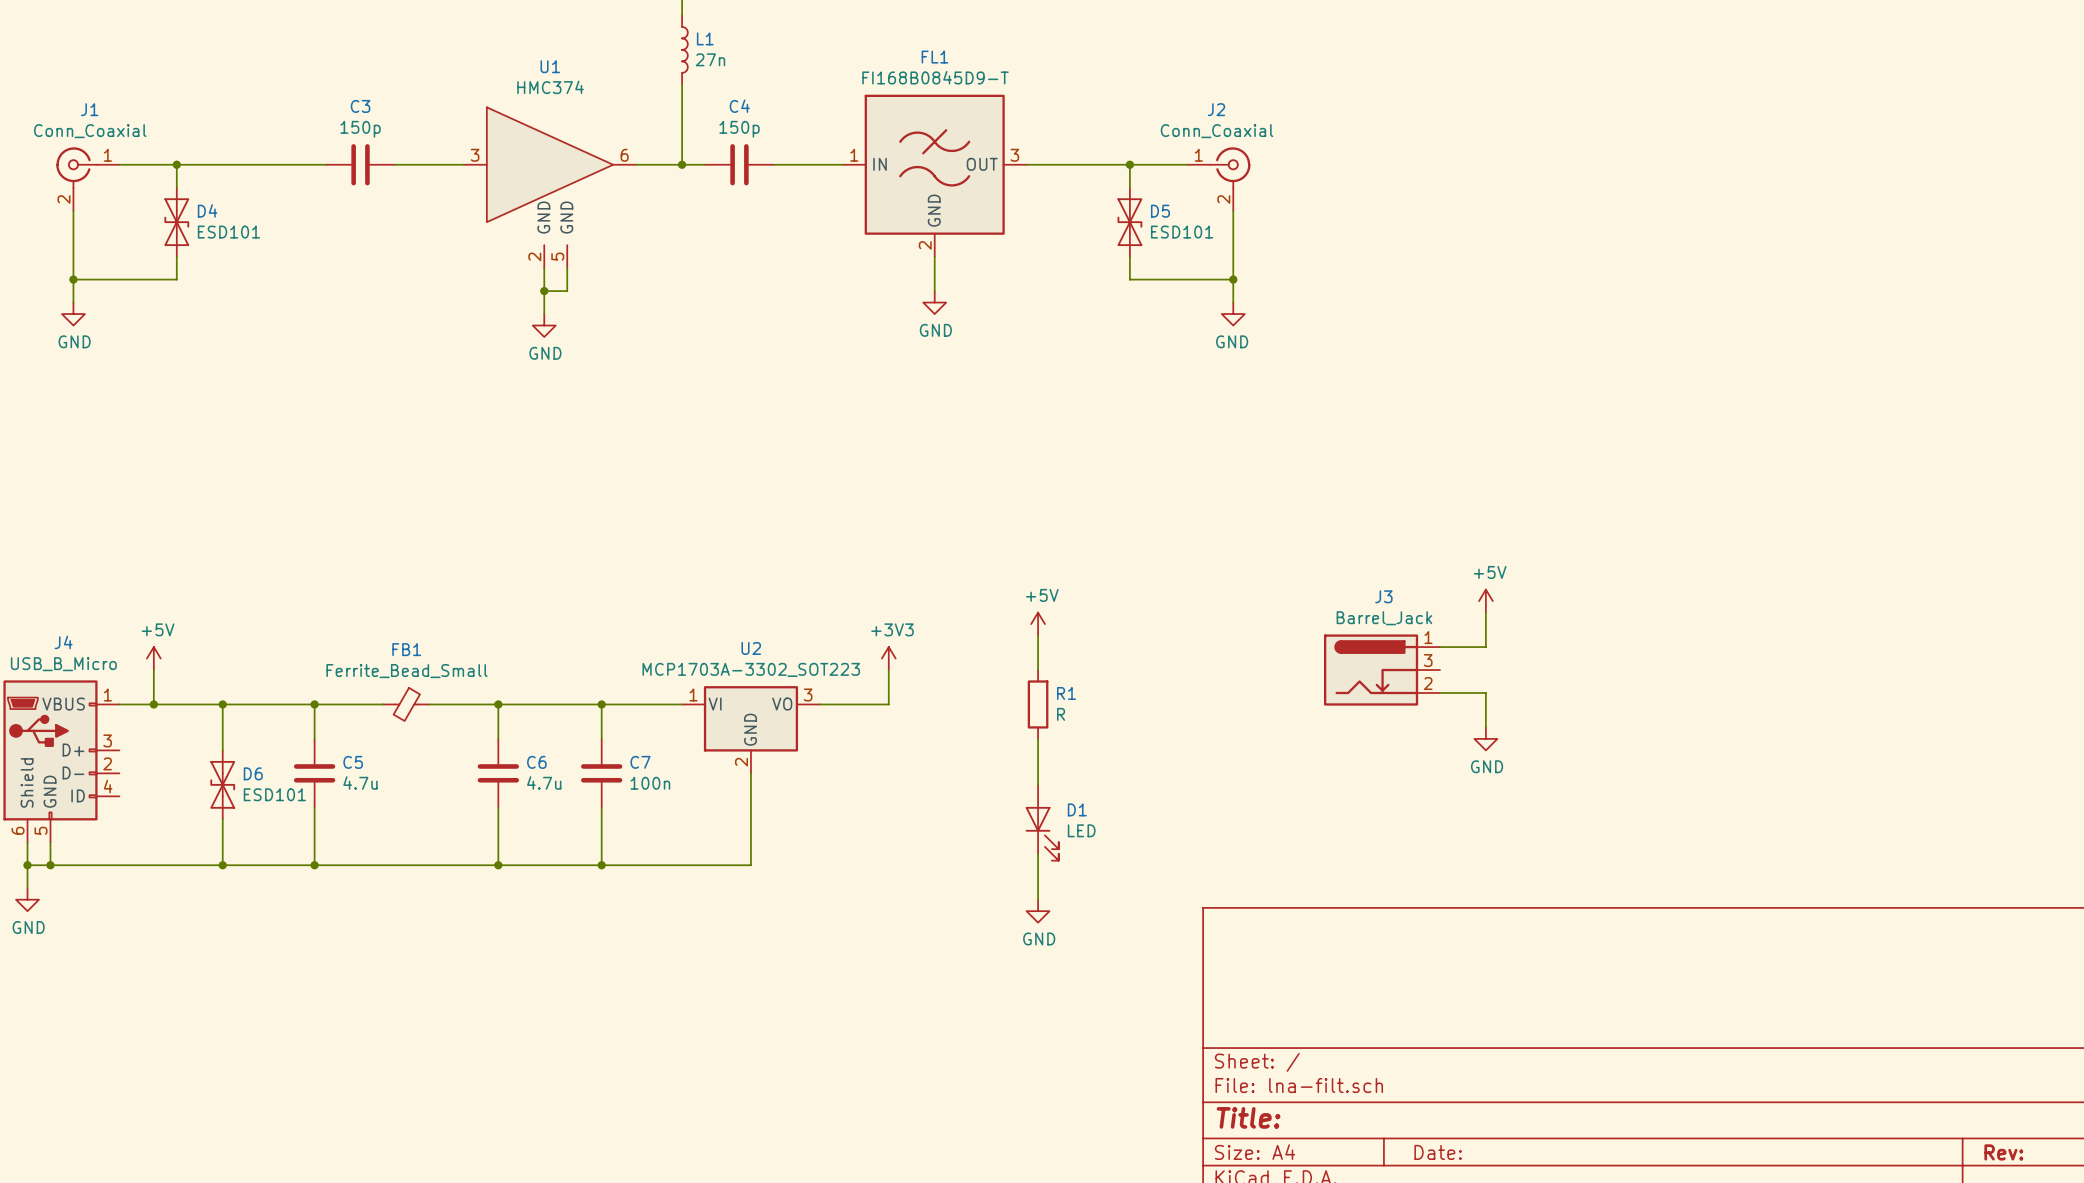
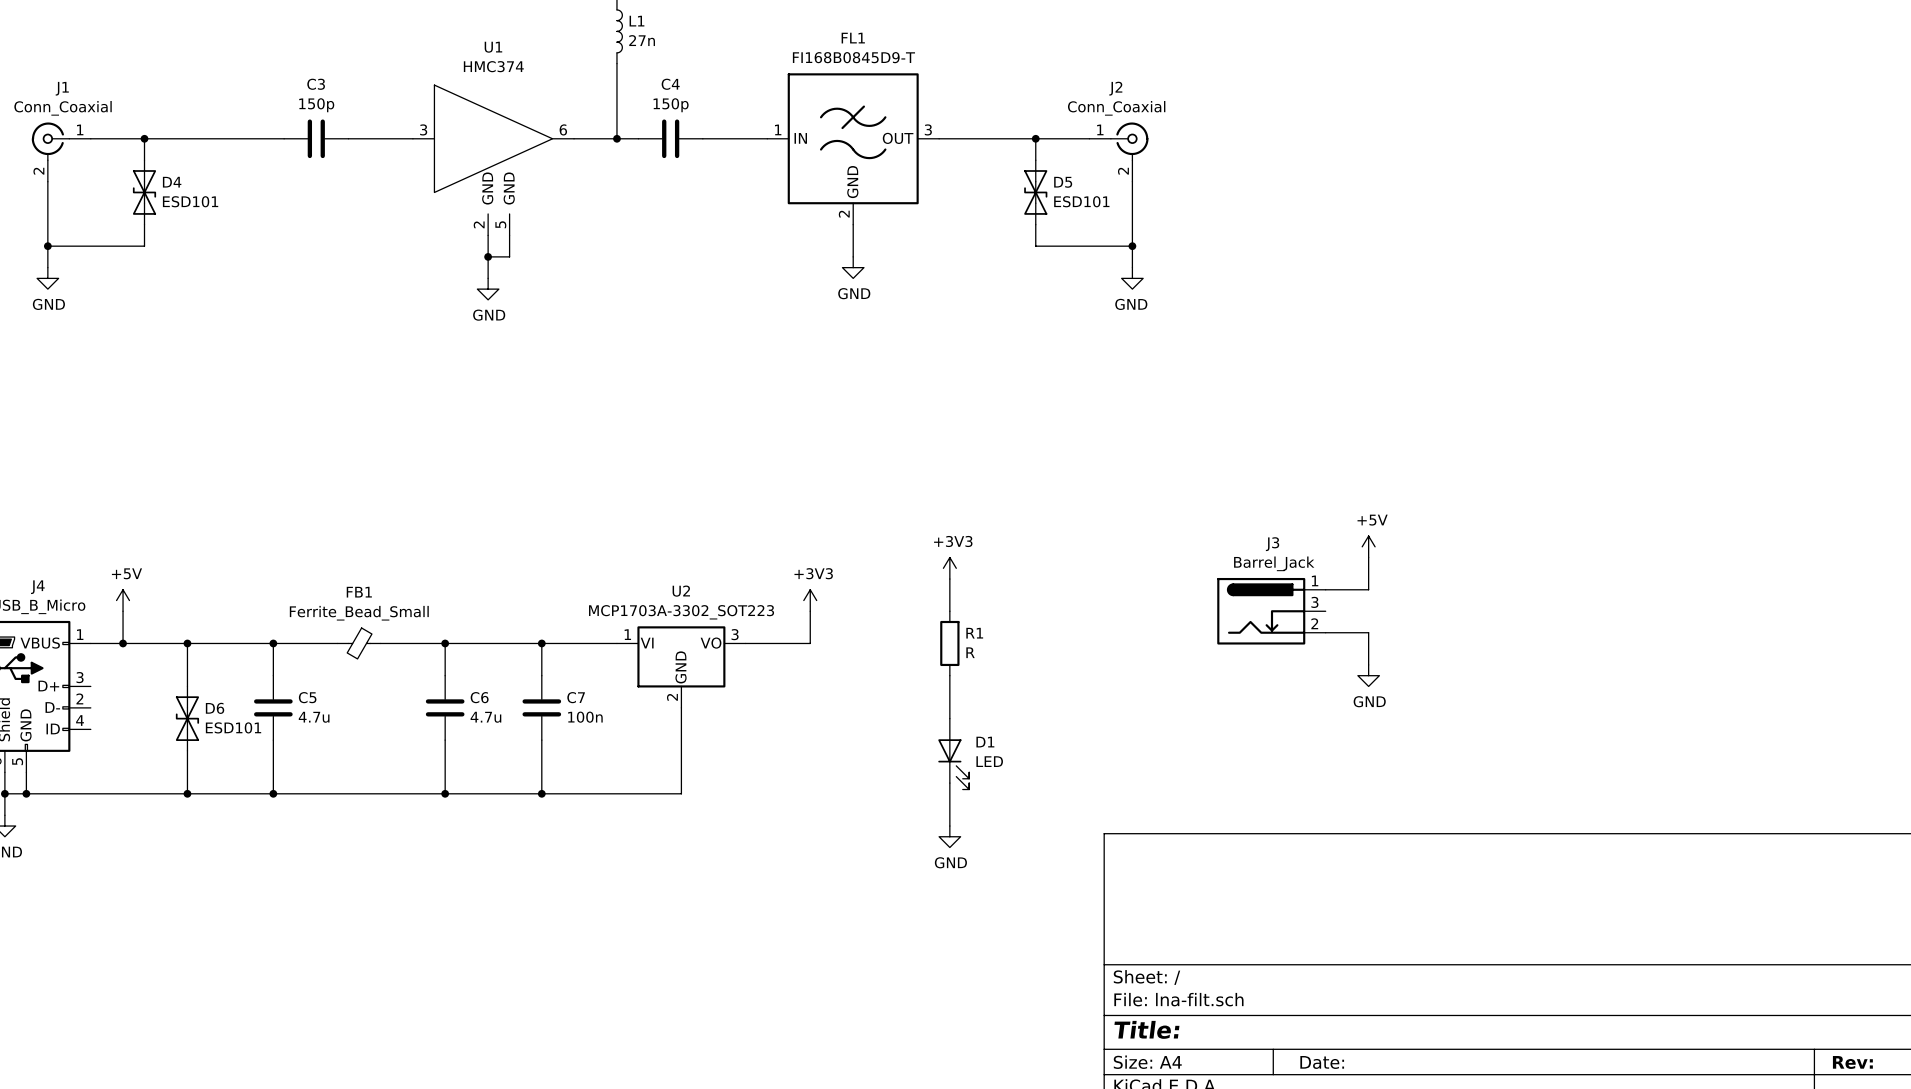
power symbol: +5V (1038, 624) -> +3V3 (949, 568)

